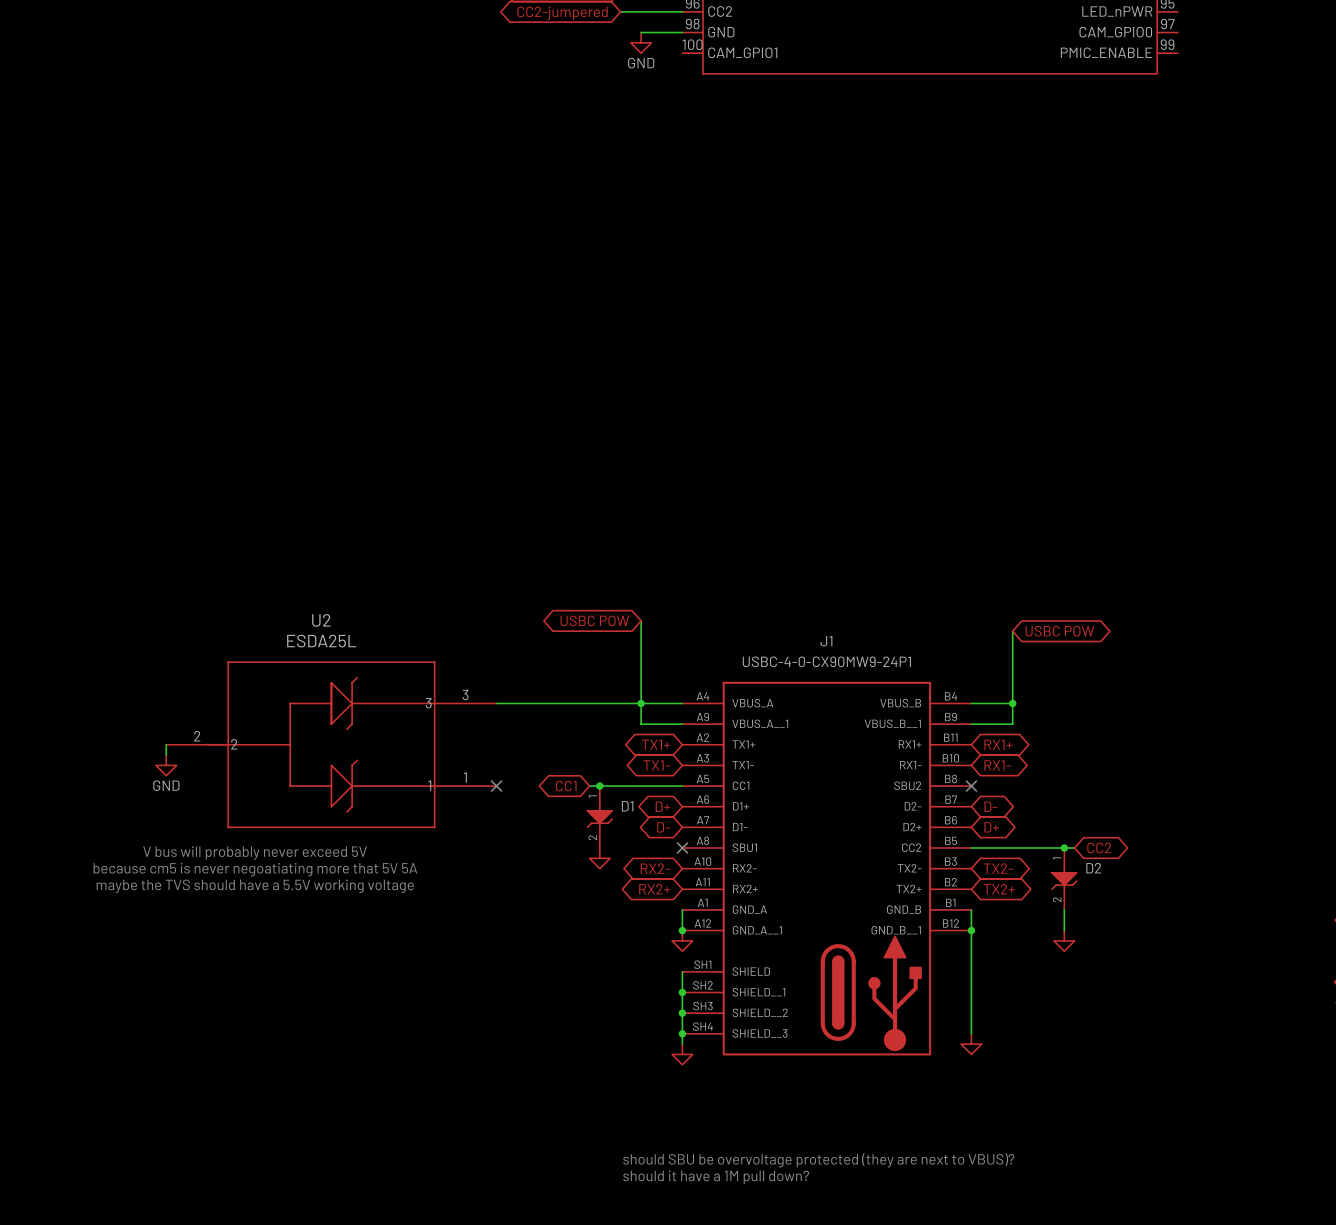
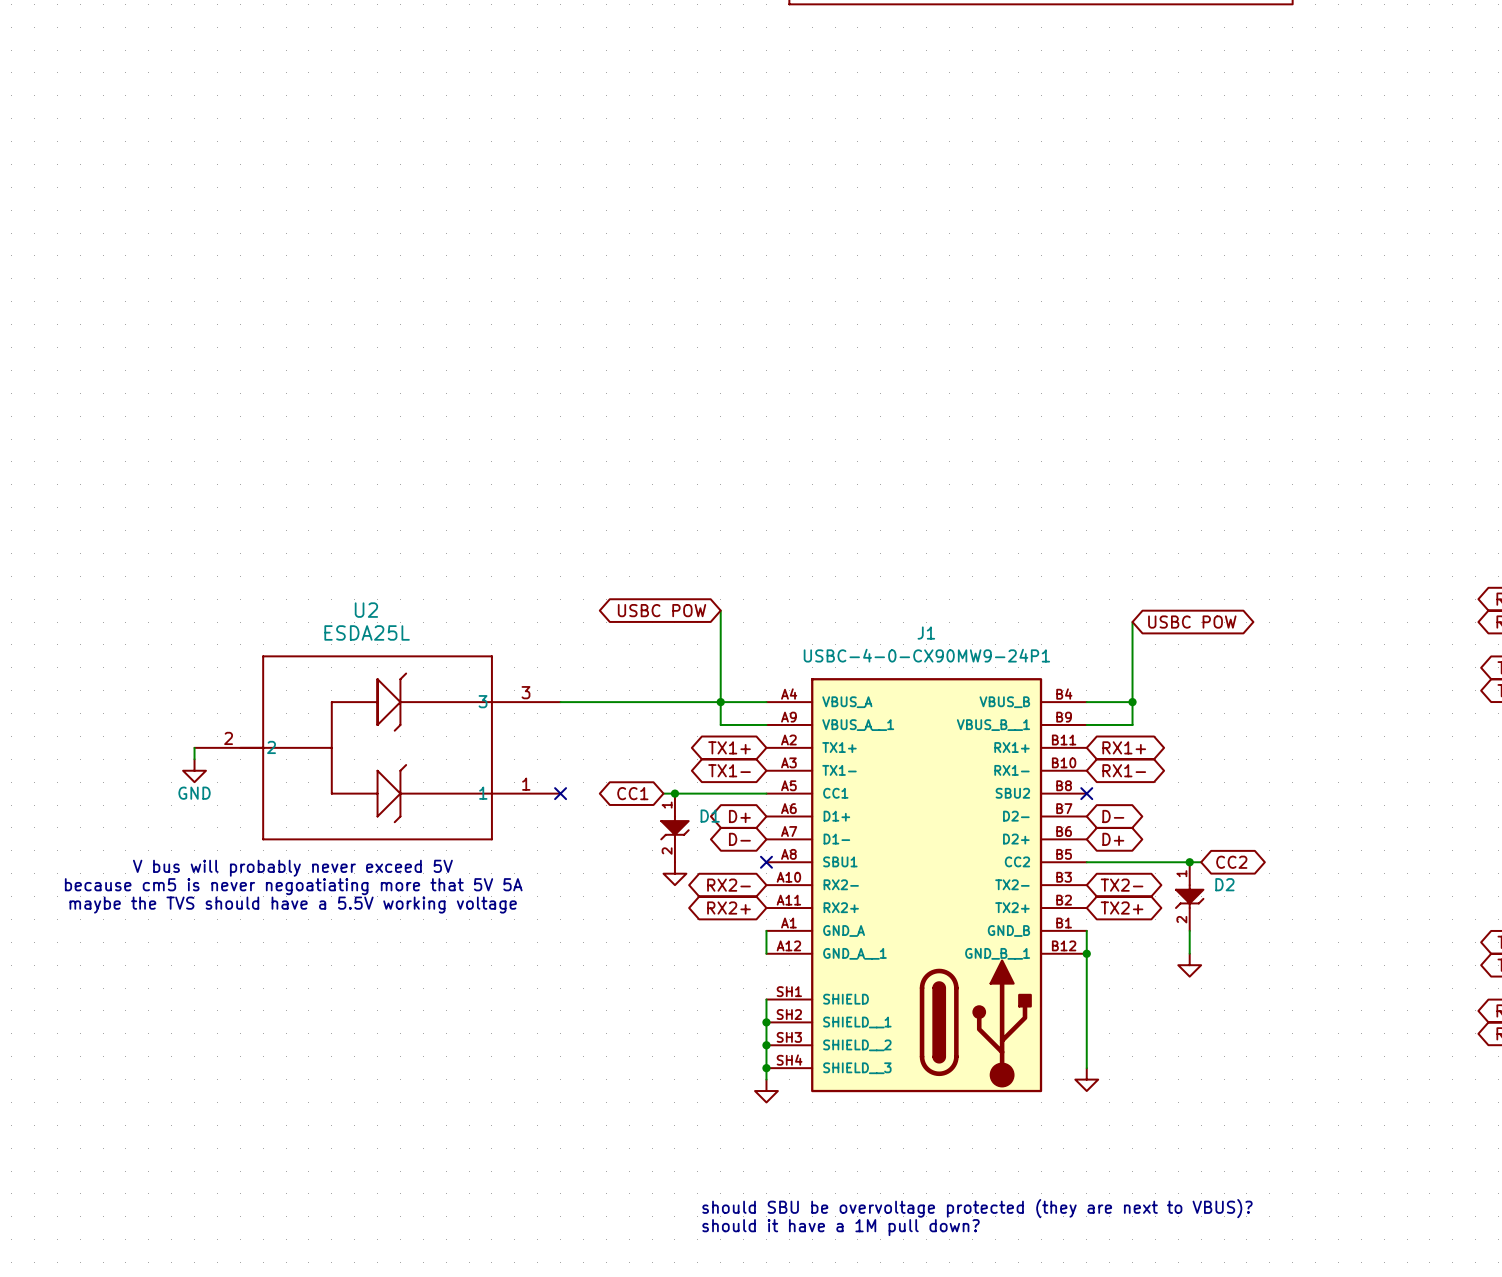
junction: (682, 930) -> none
power symbol: (682, 940) -> none

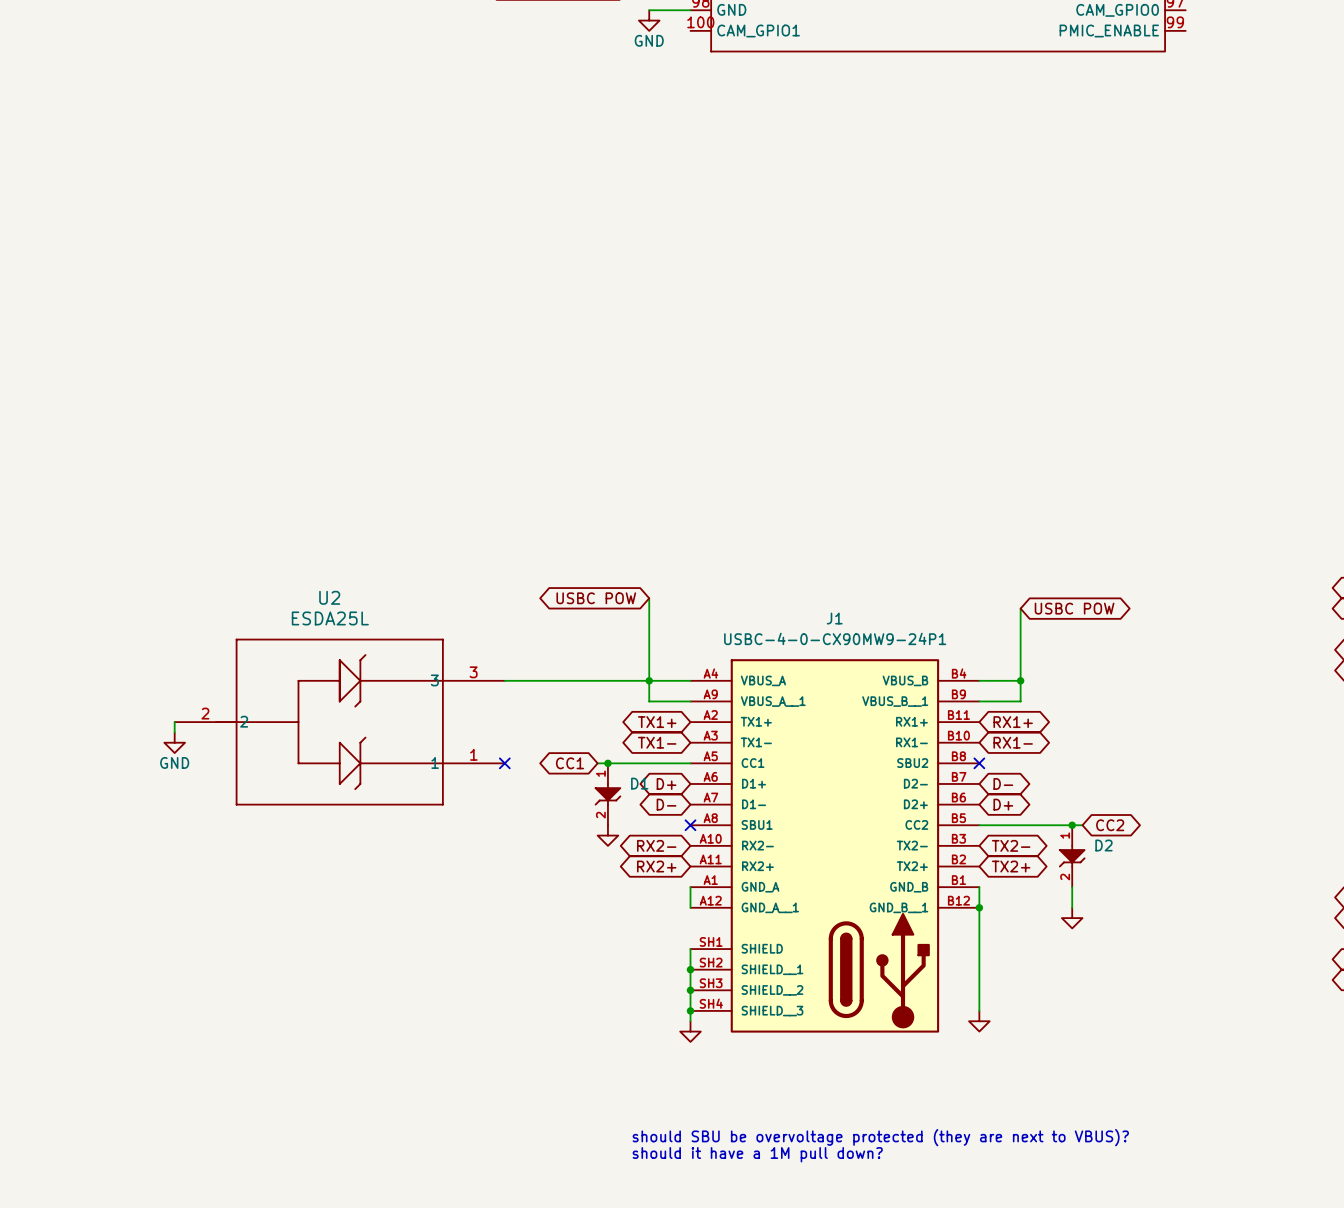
text: V bus will probably never exceed 5V (292, 868) -> none
text: because cm5 is never negoatiating more that 5V 5A (293, 886) -> none
text: maybe the TVS should have a 5.5V working voltage (293, 905) -> none

